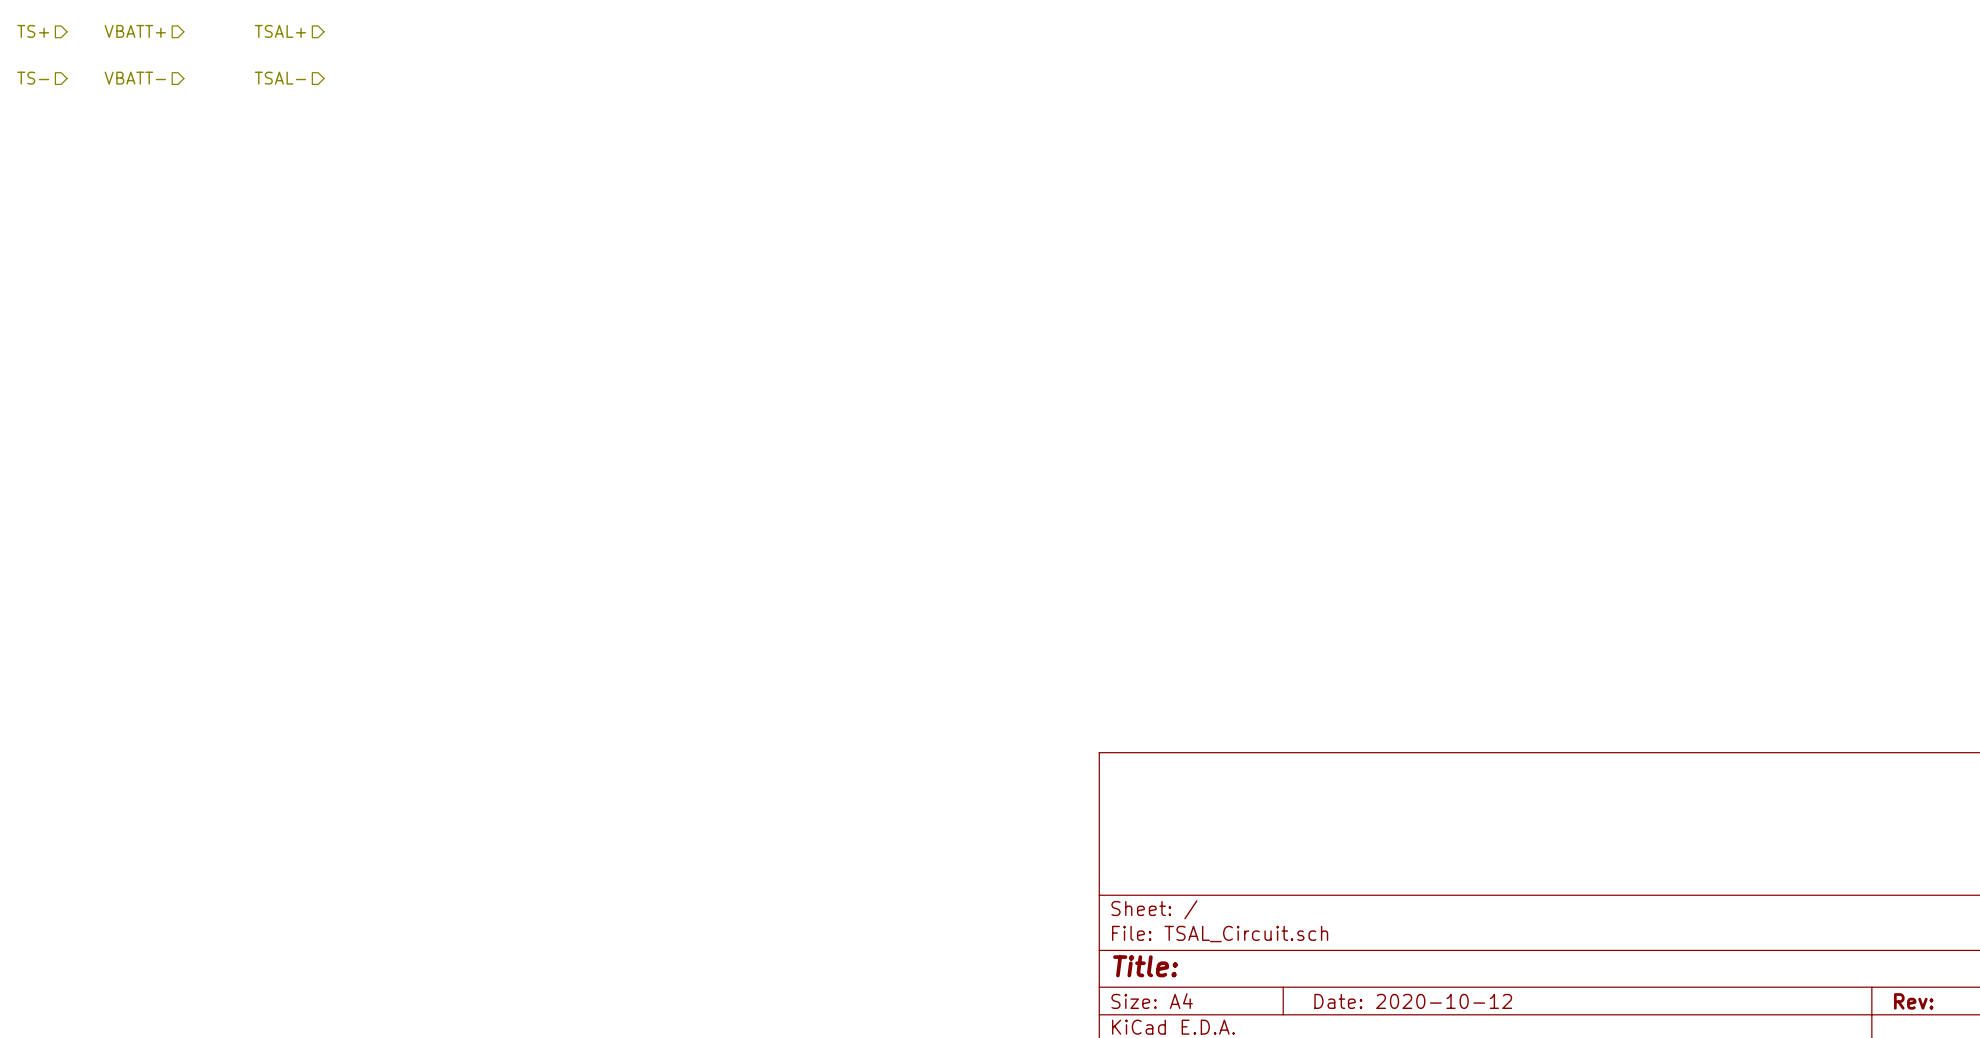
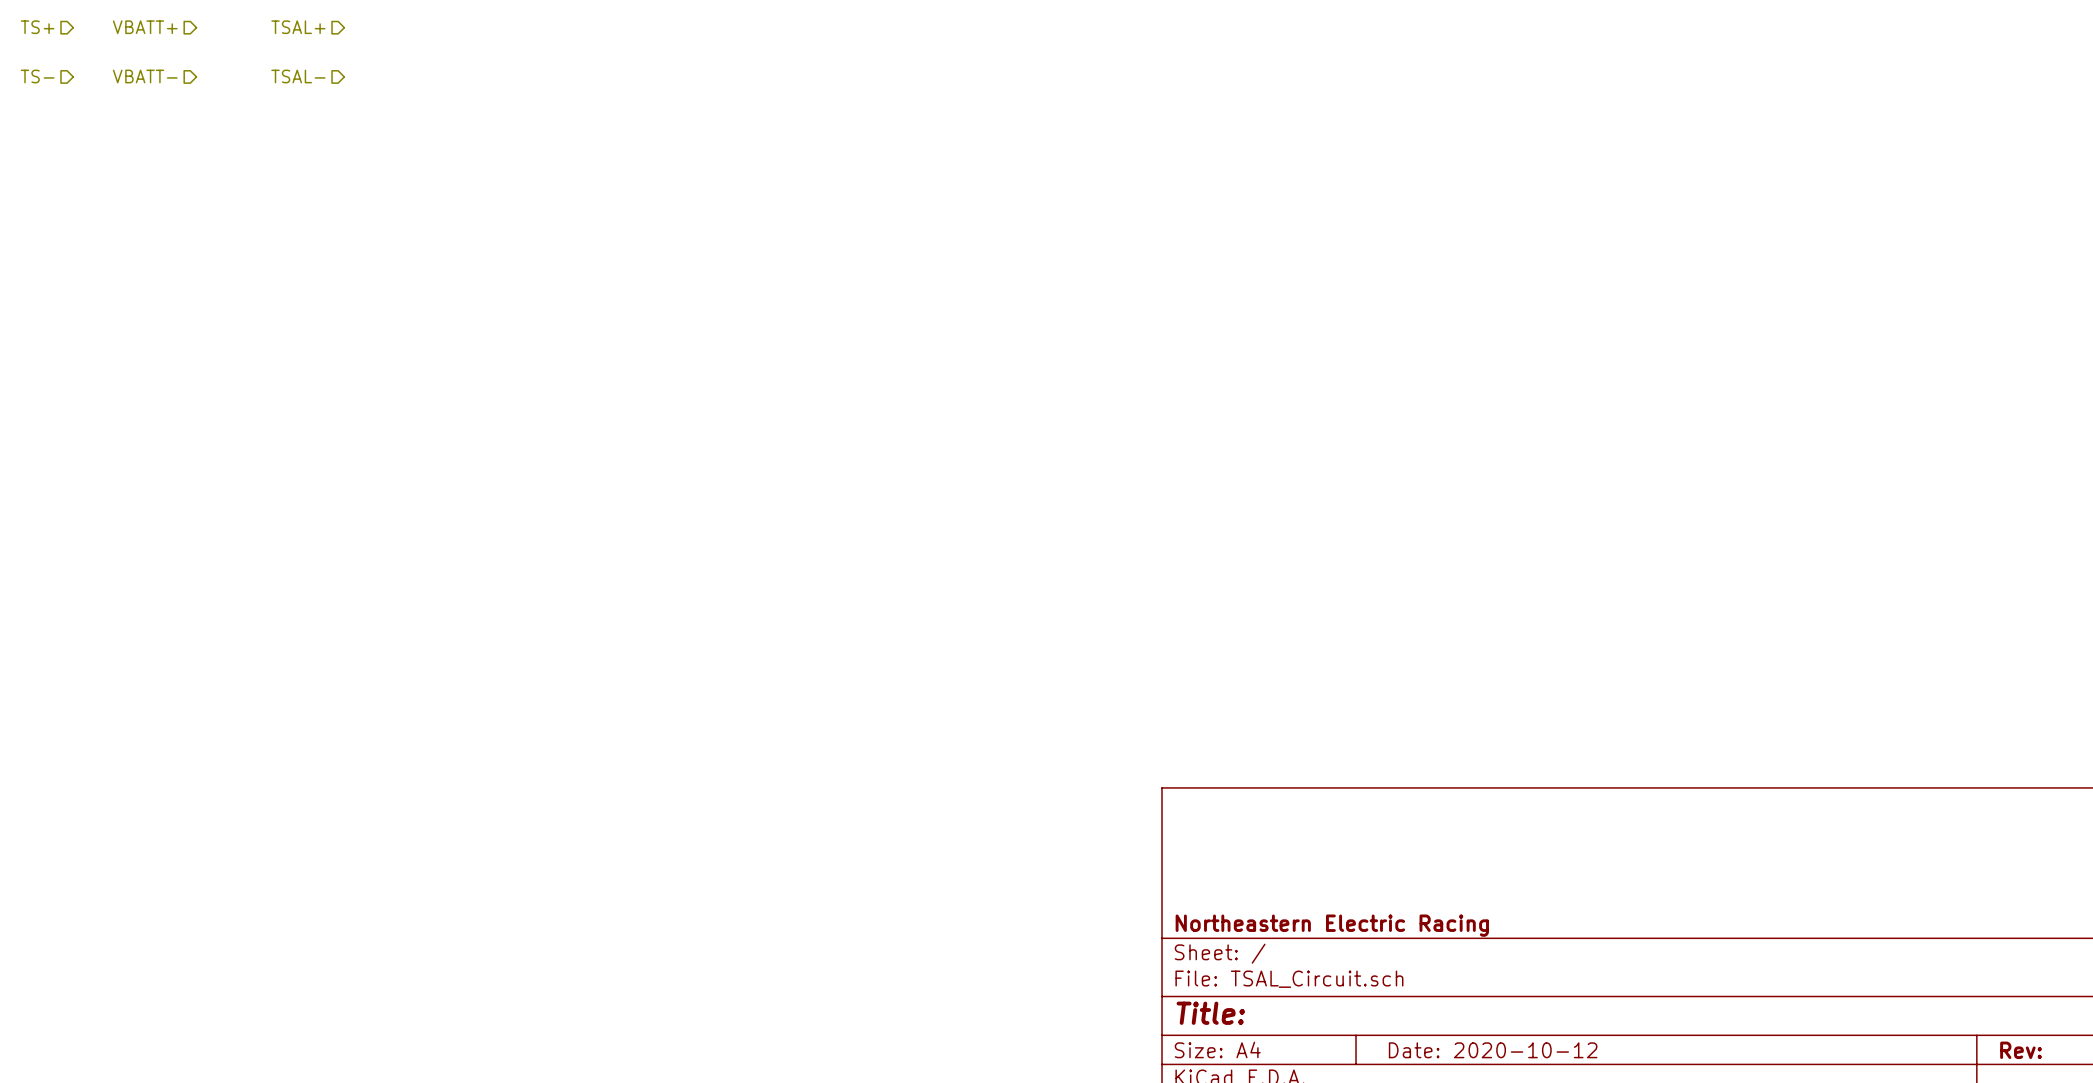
title block: none -> Northeastern Electric Racing (1332, 925)

